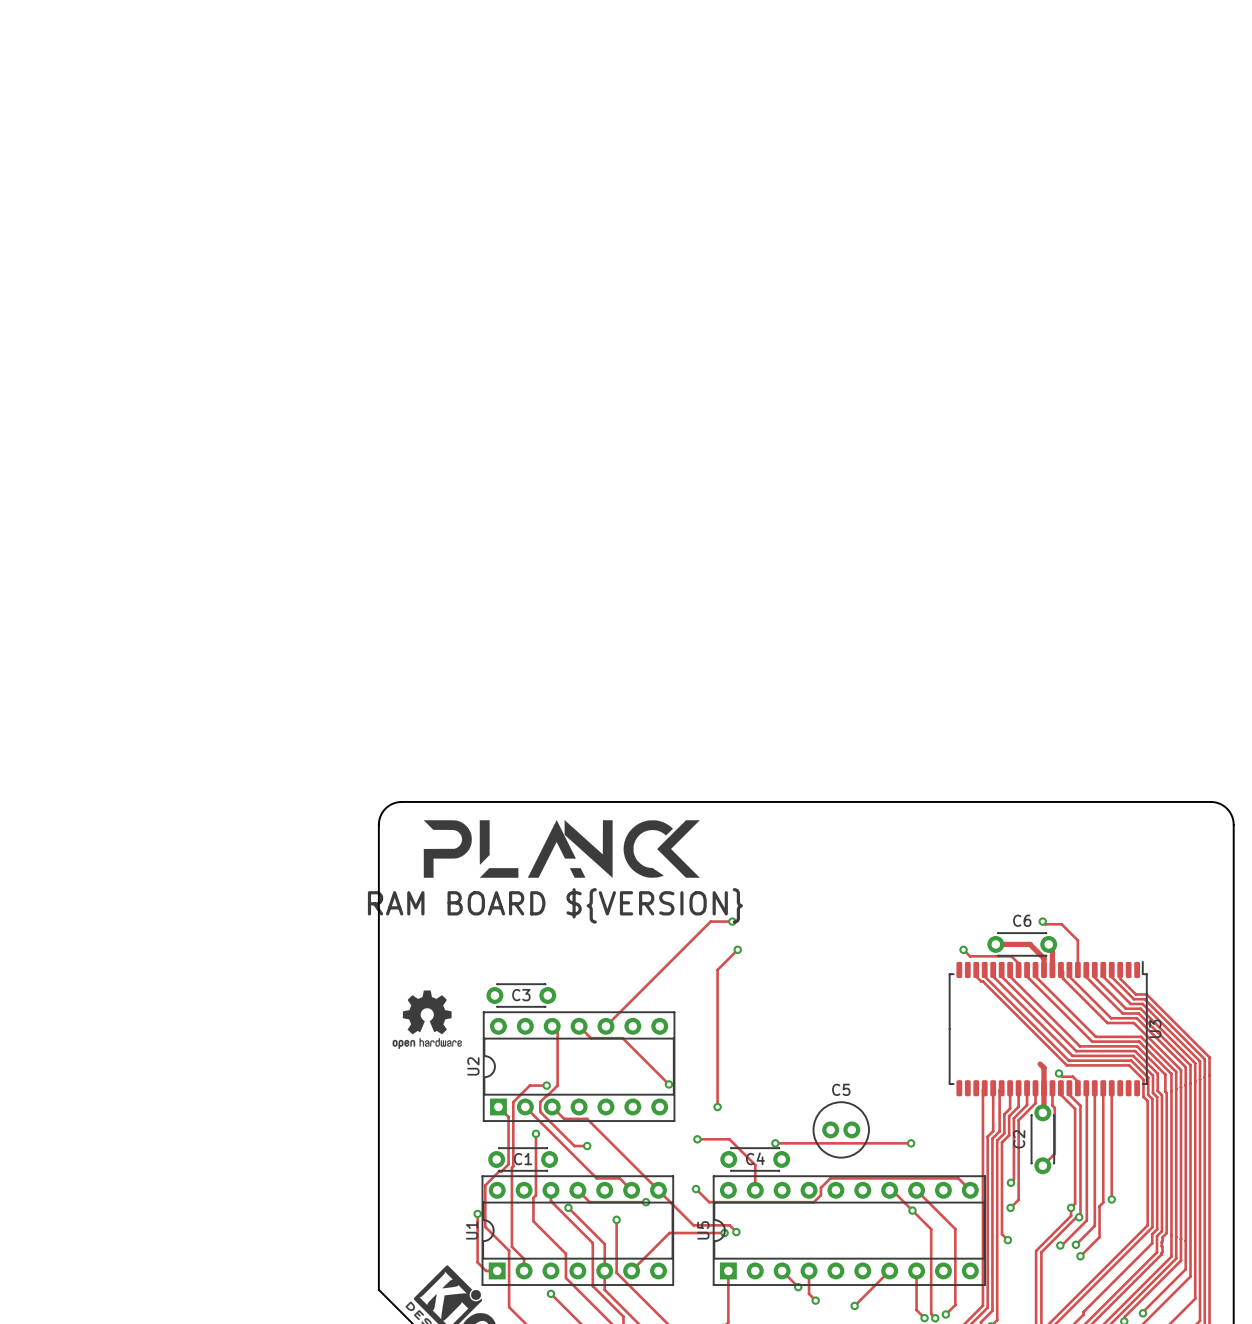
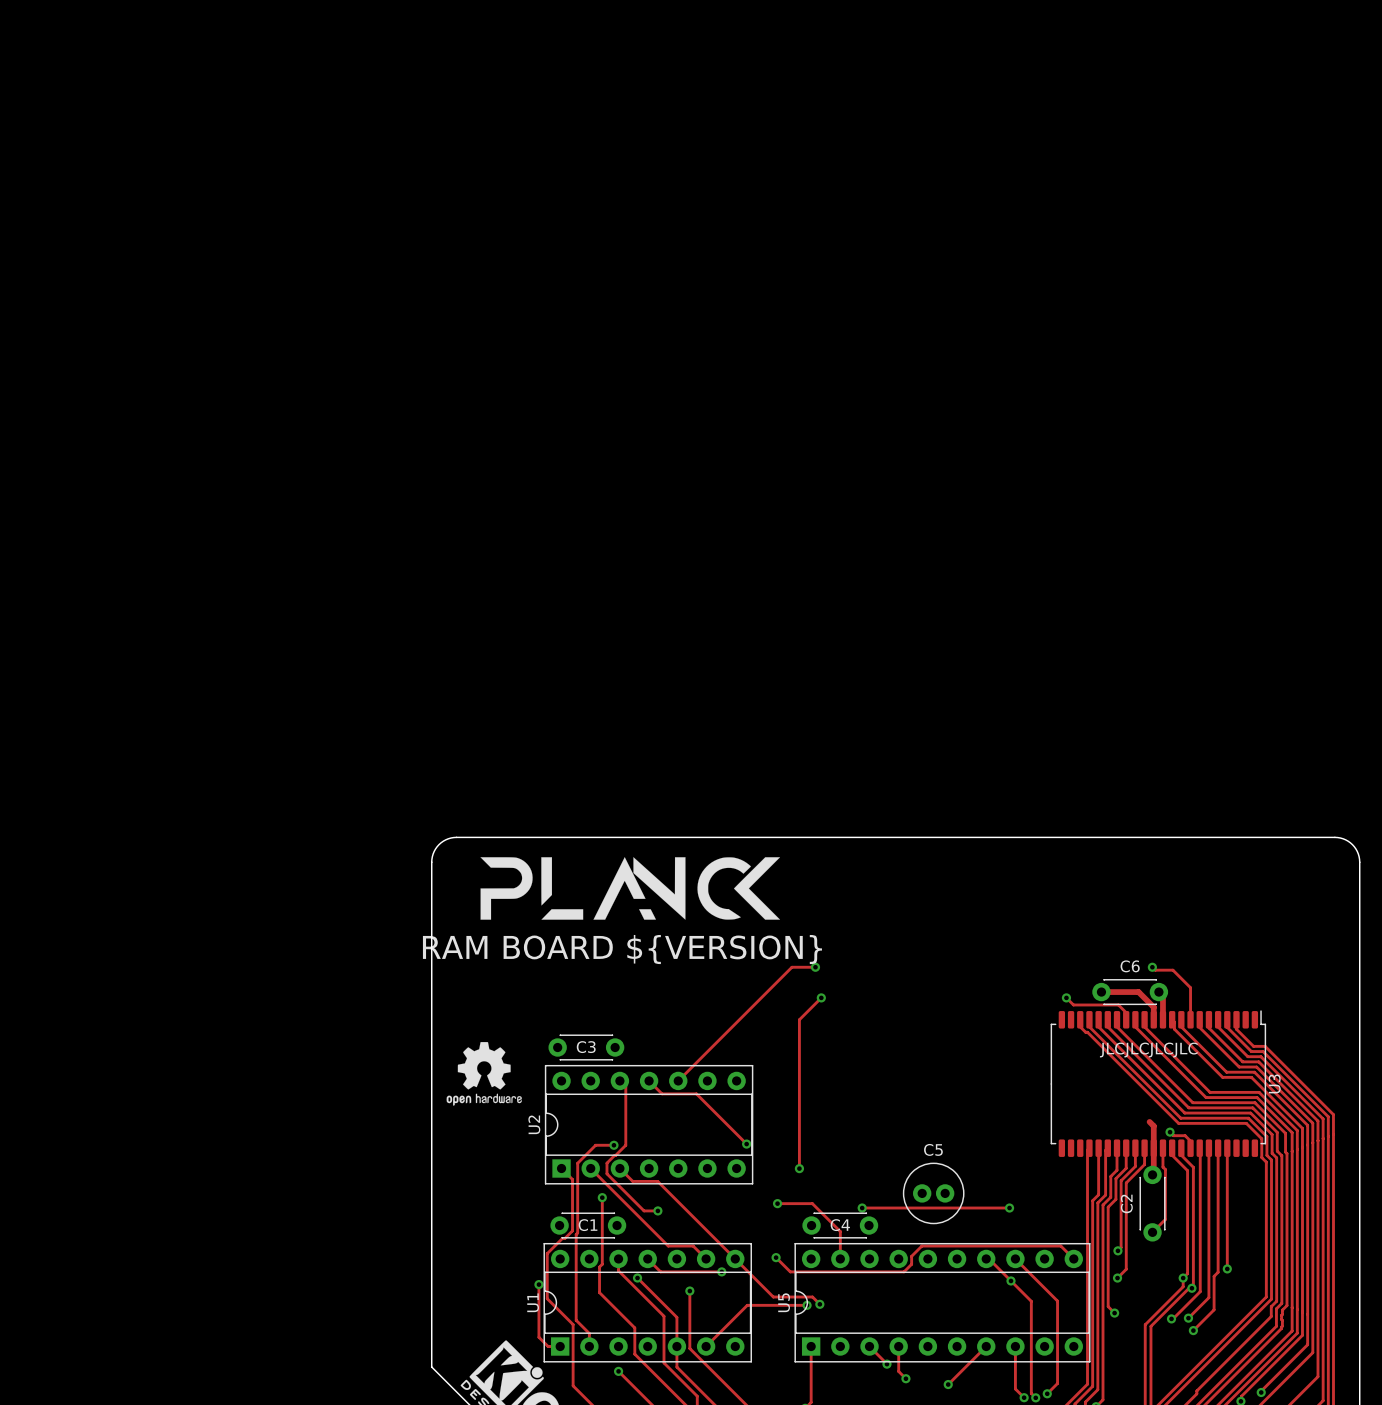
text: none -> JLCJLCJLCJLC (1148, 1050)

